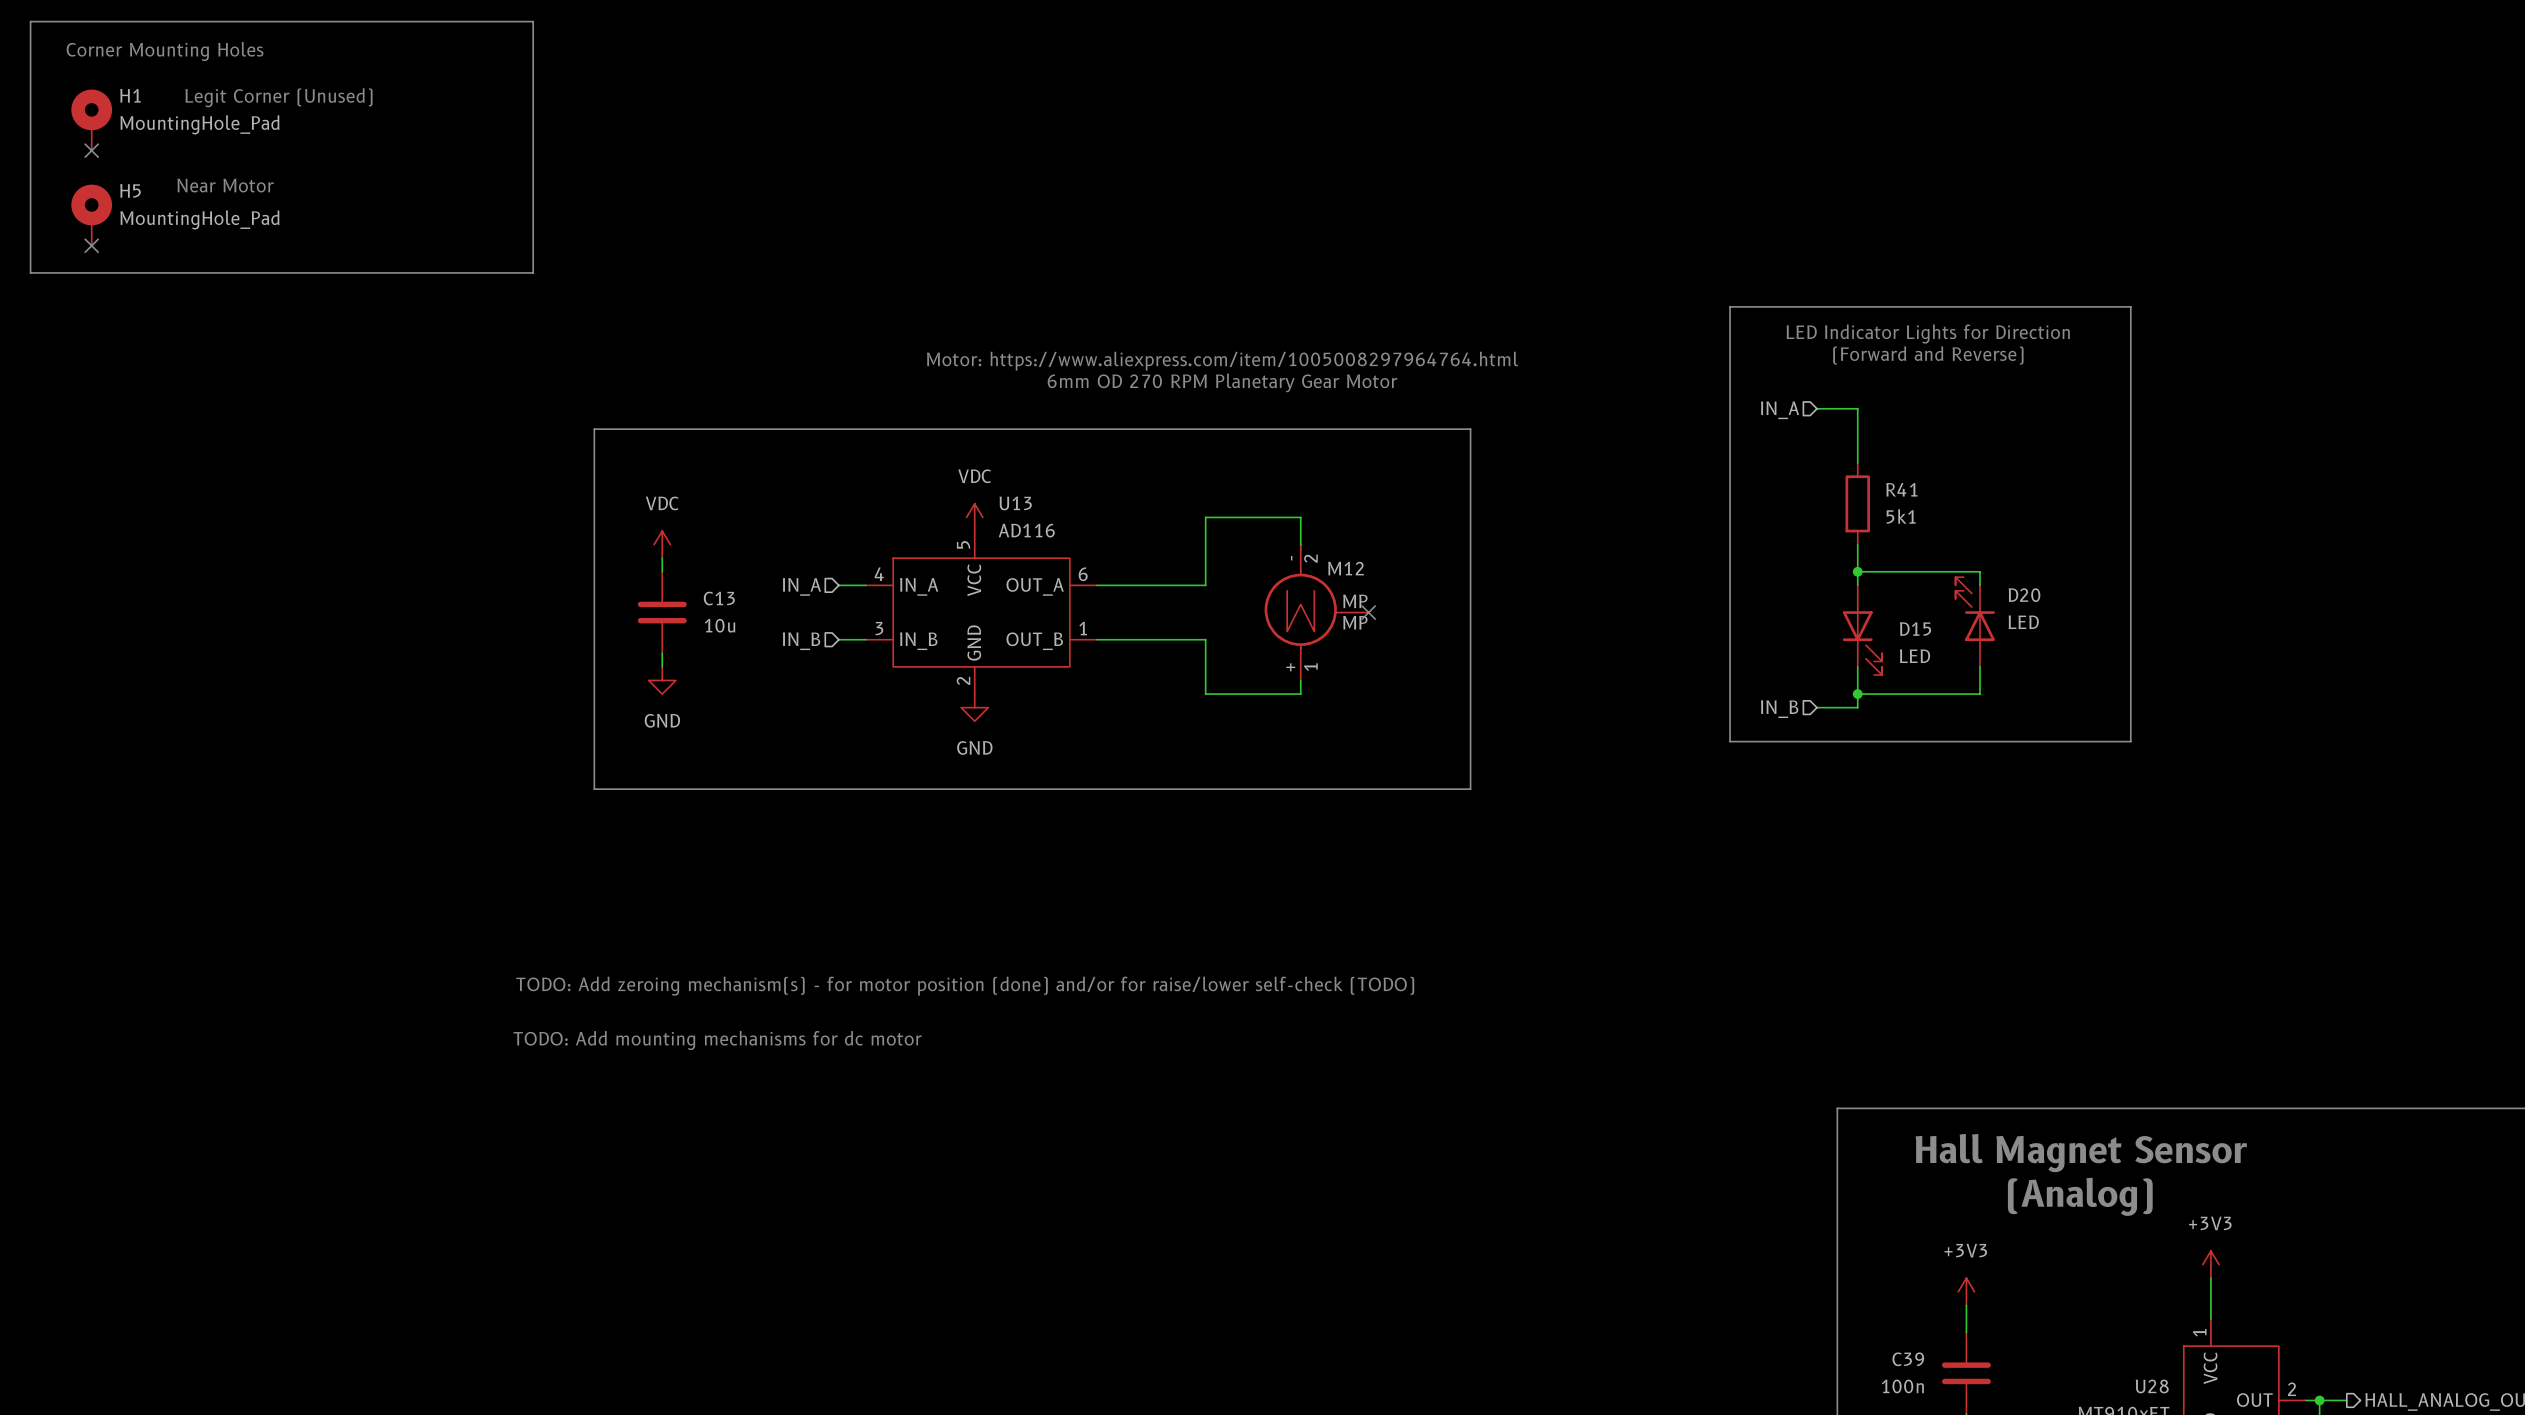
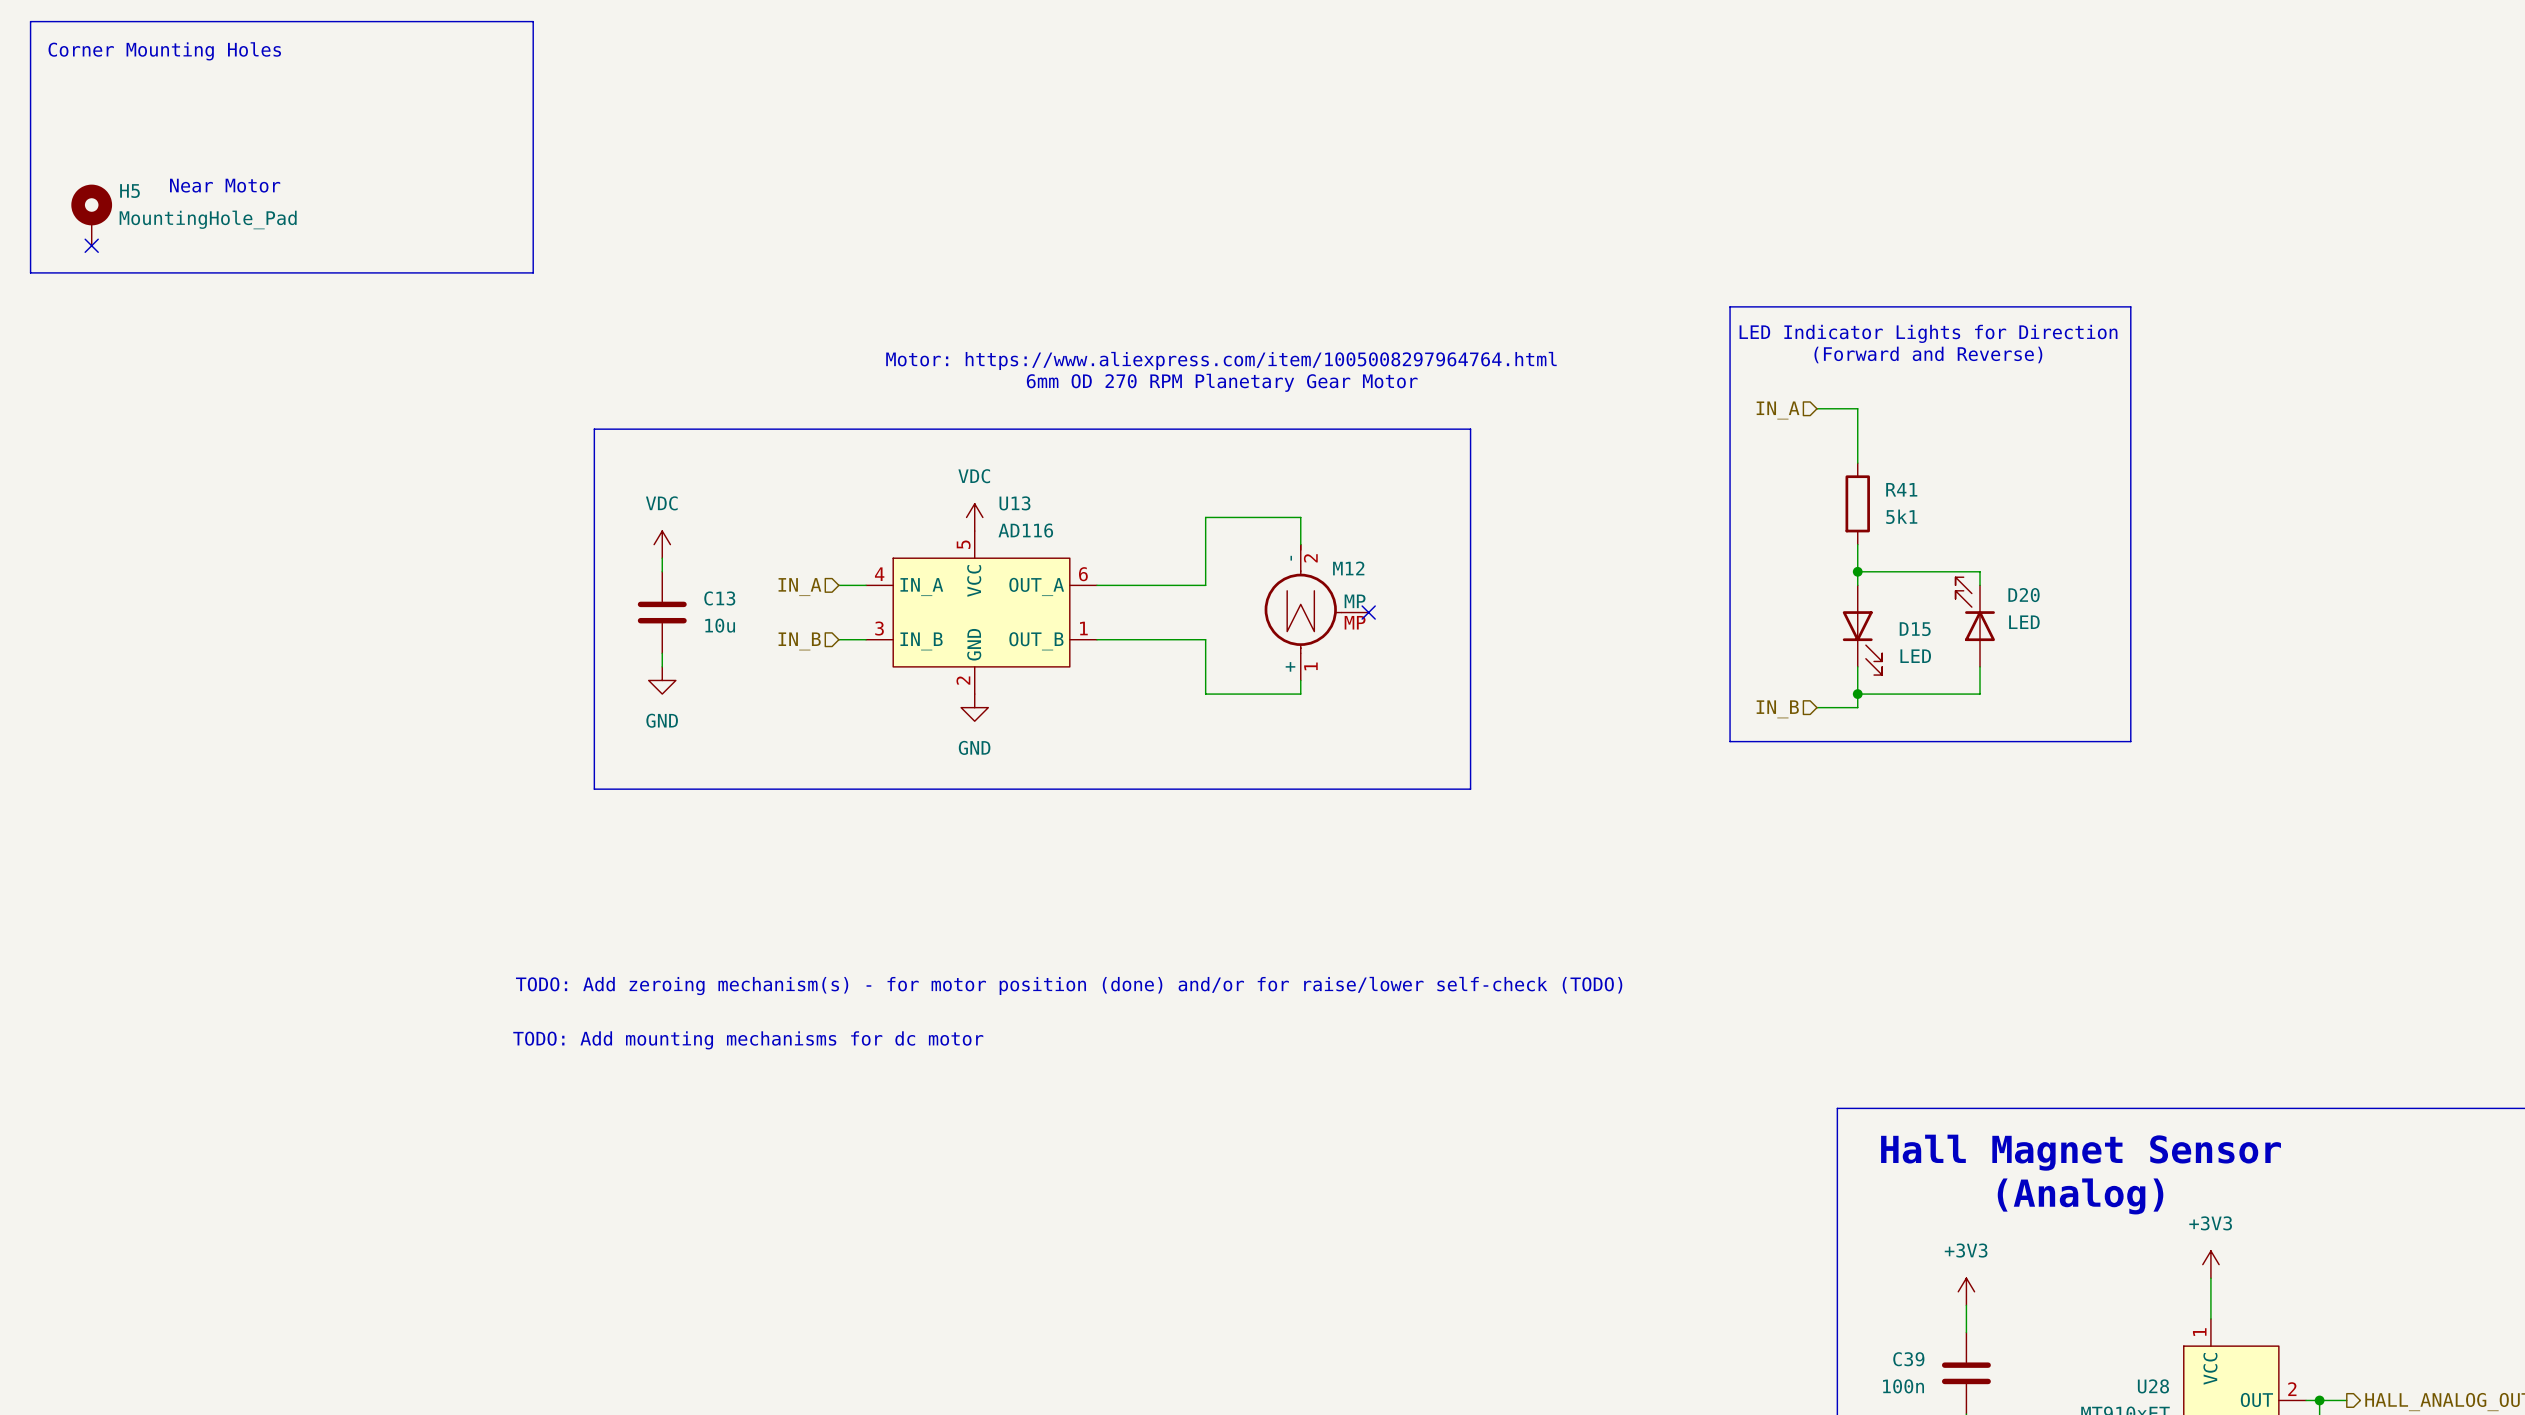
text: Legit Corner (Unused) (278, 97) -> none
H1: MountingHole_Pad (91, 120) -> none
no-connect mark: (91, 150) -> none

